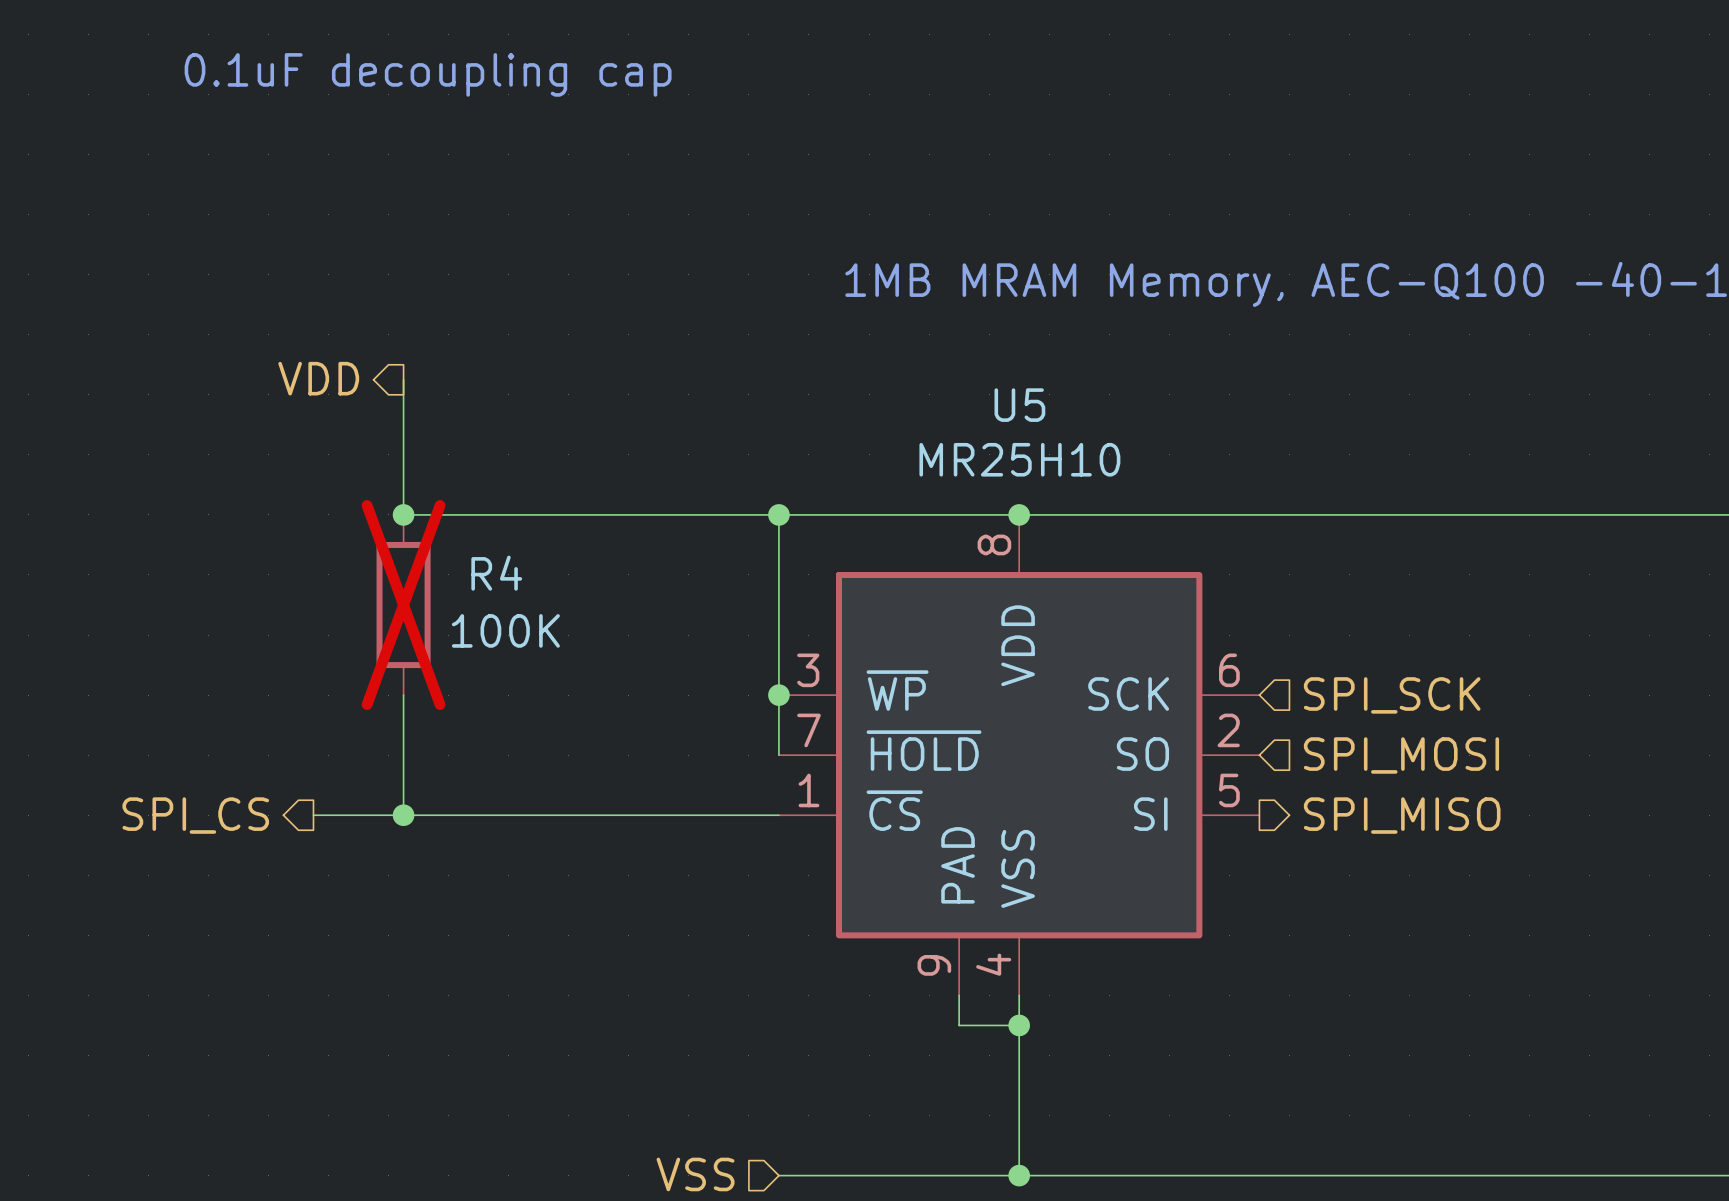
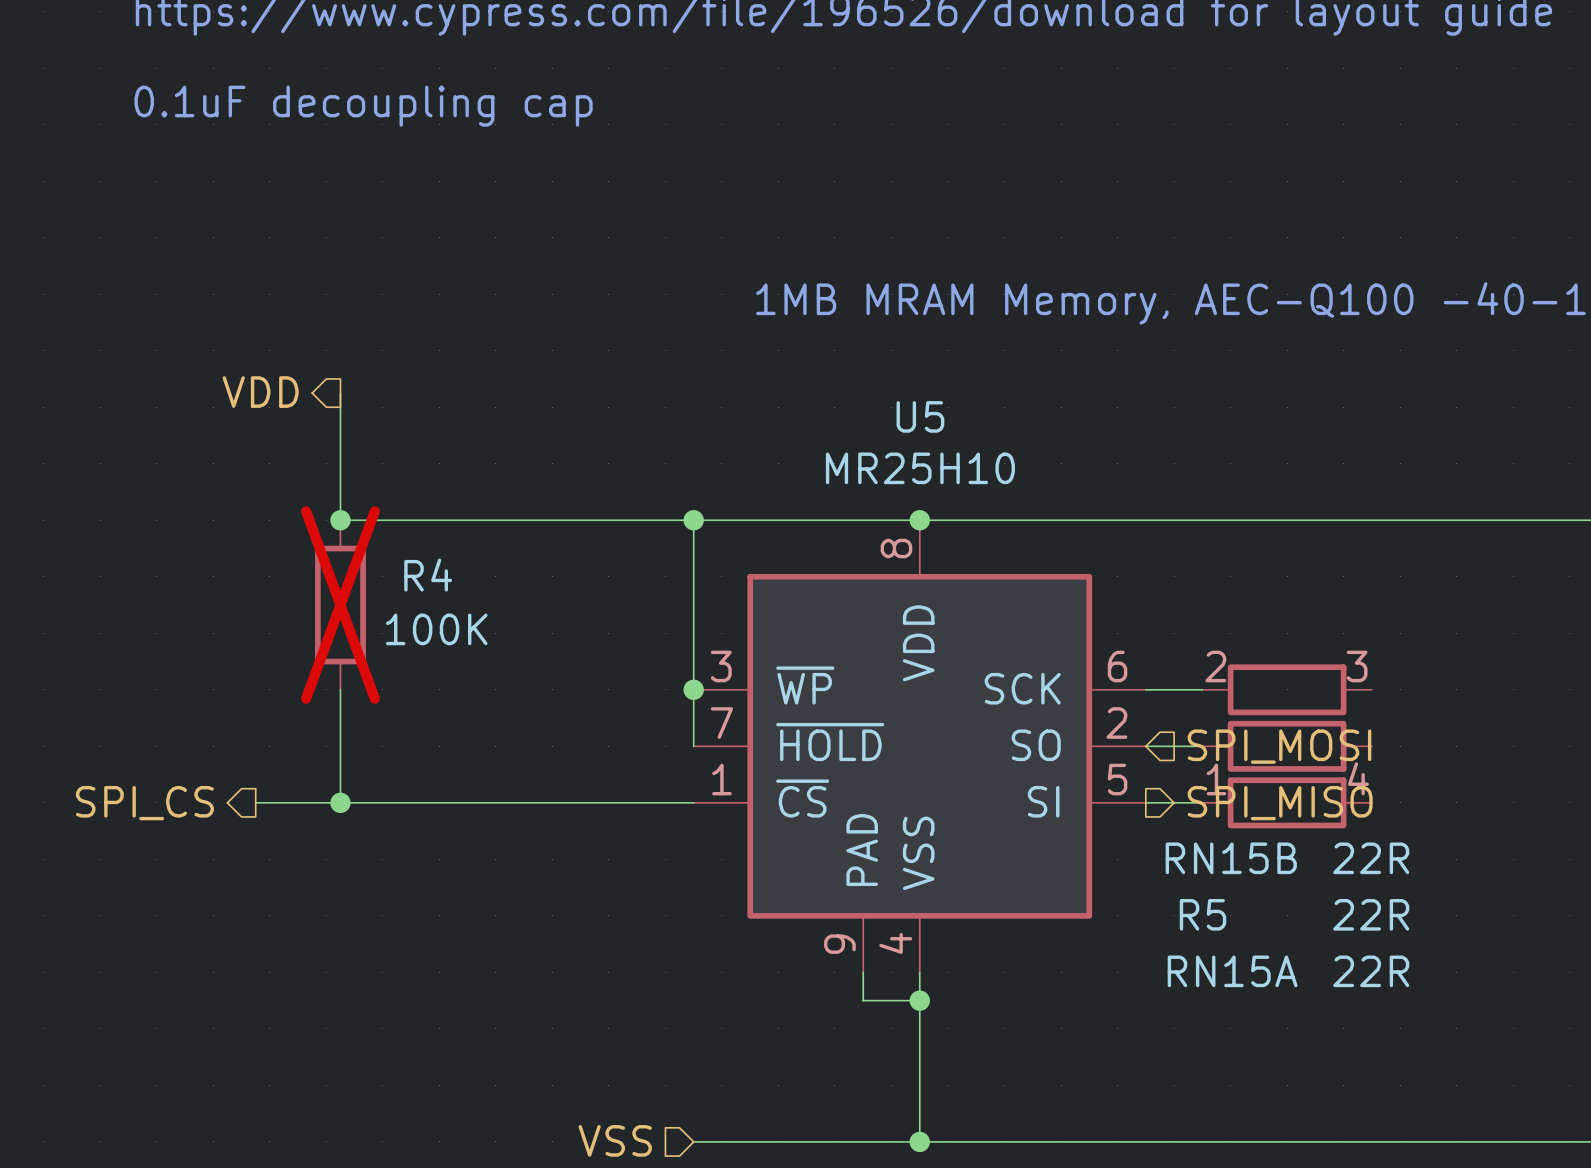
wire: none -> (1145, 689) (1202, 689)
hierarchical label: SPI_SCK (1392, 695) -> none
RN15B: none -> 22R (1287, 689)
wire: none -> (1145, 746) (1202, 746)
R5: none -> 22R (1287, 746)
wire: none -> (1145, 802) (1202, 802)
RN15A: none -> 22R (1287, 802)

